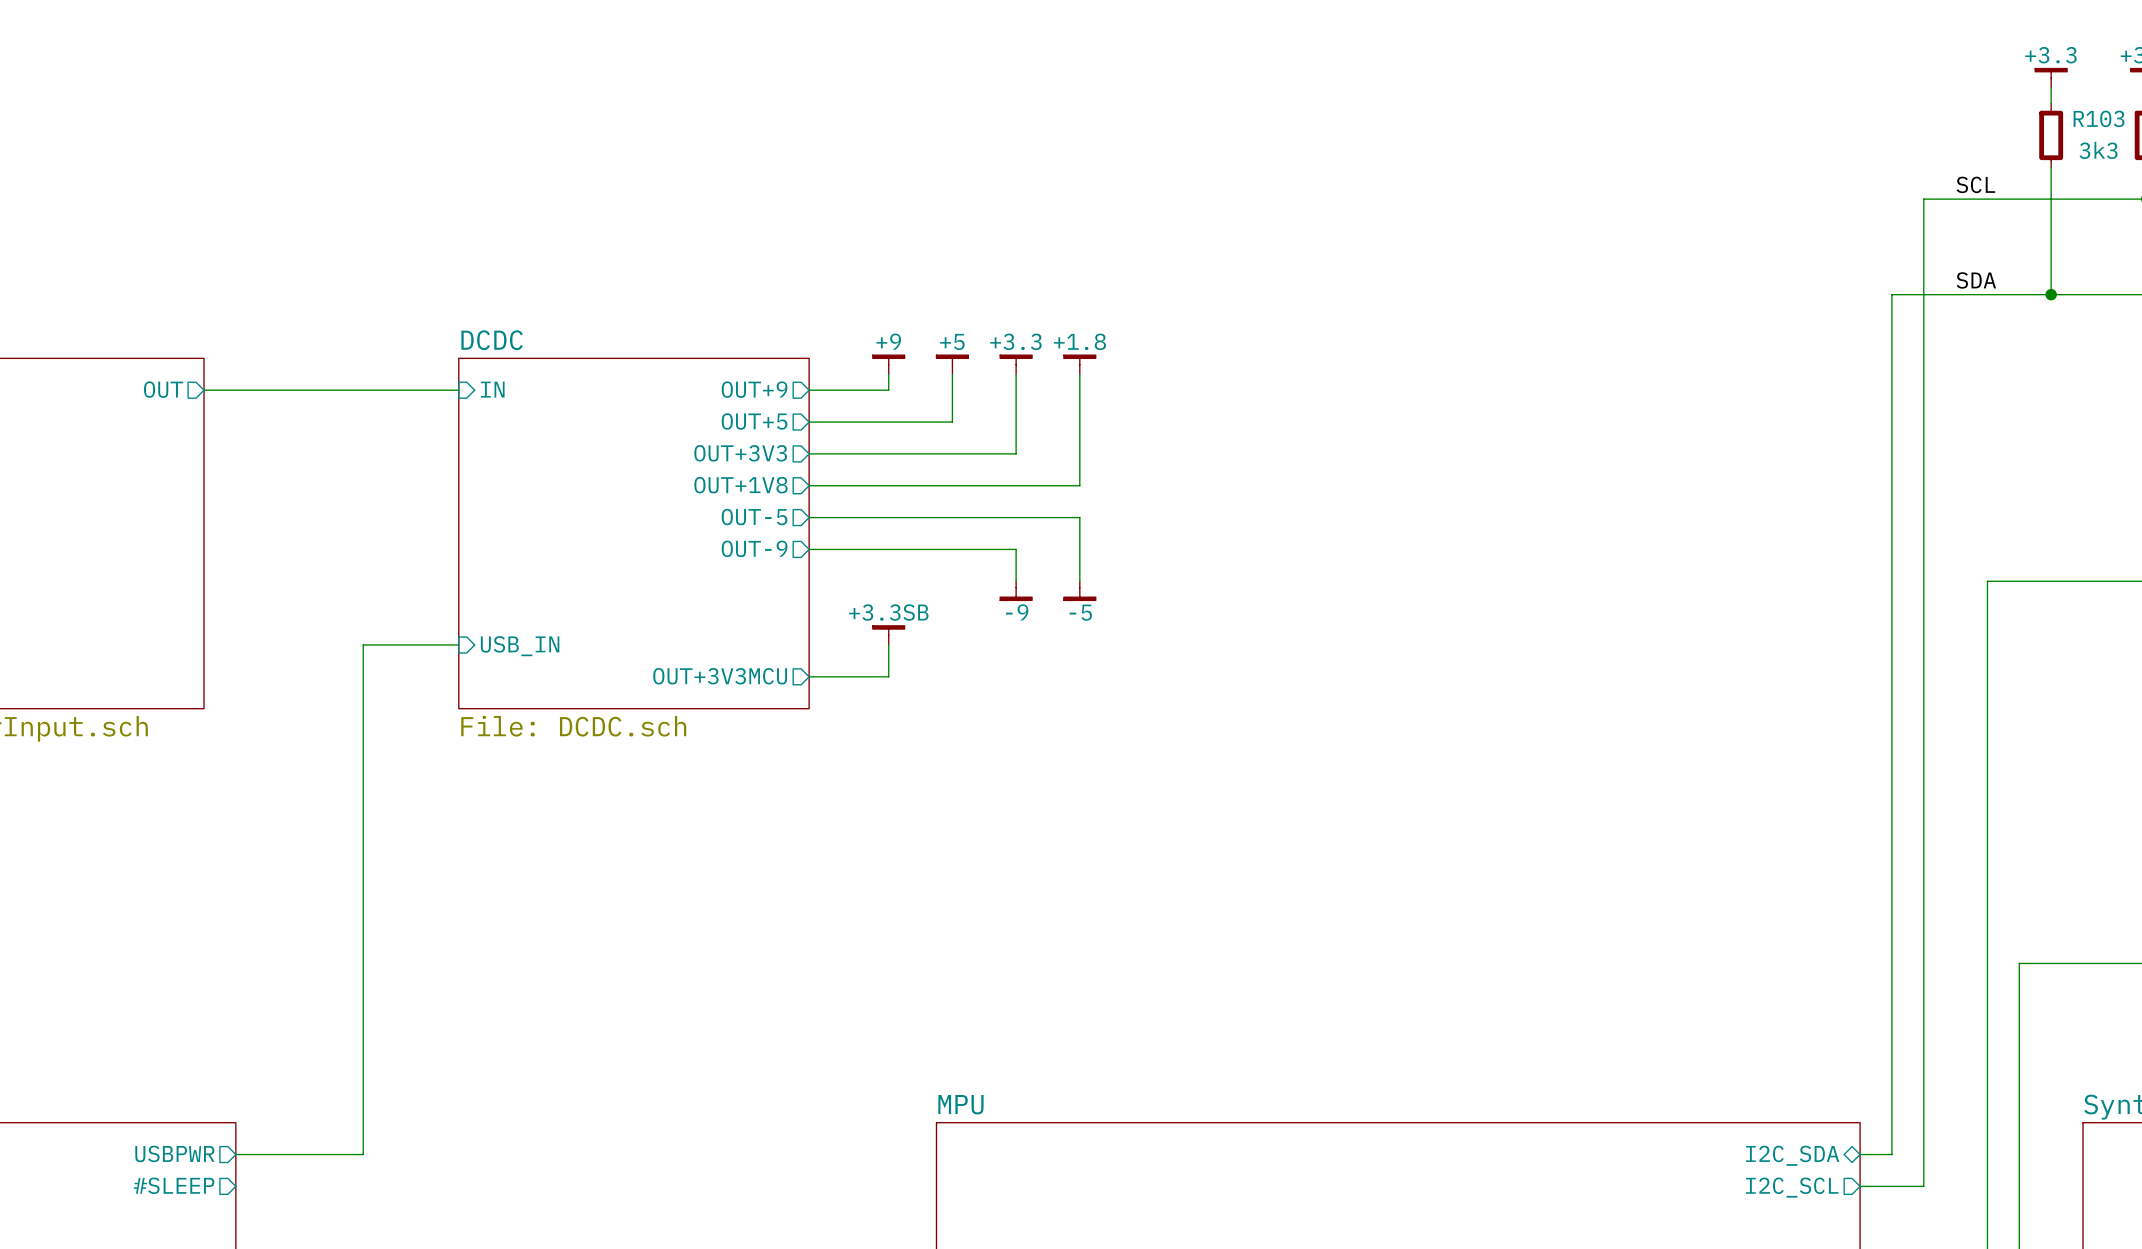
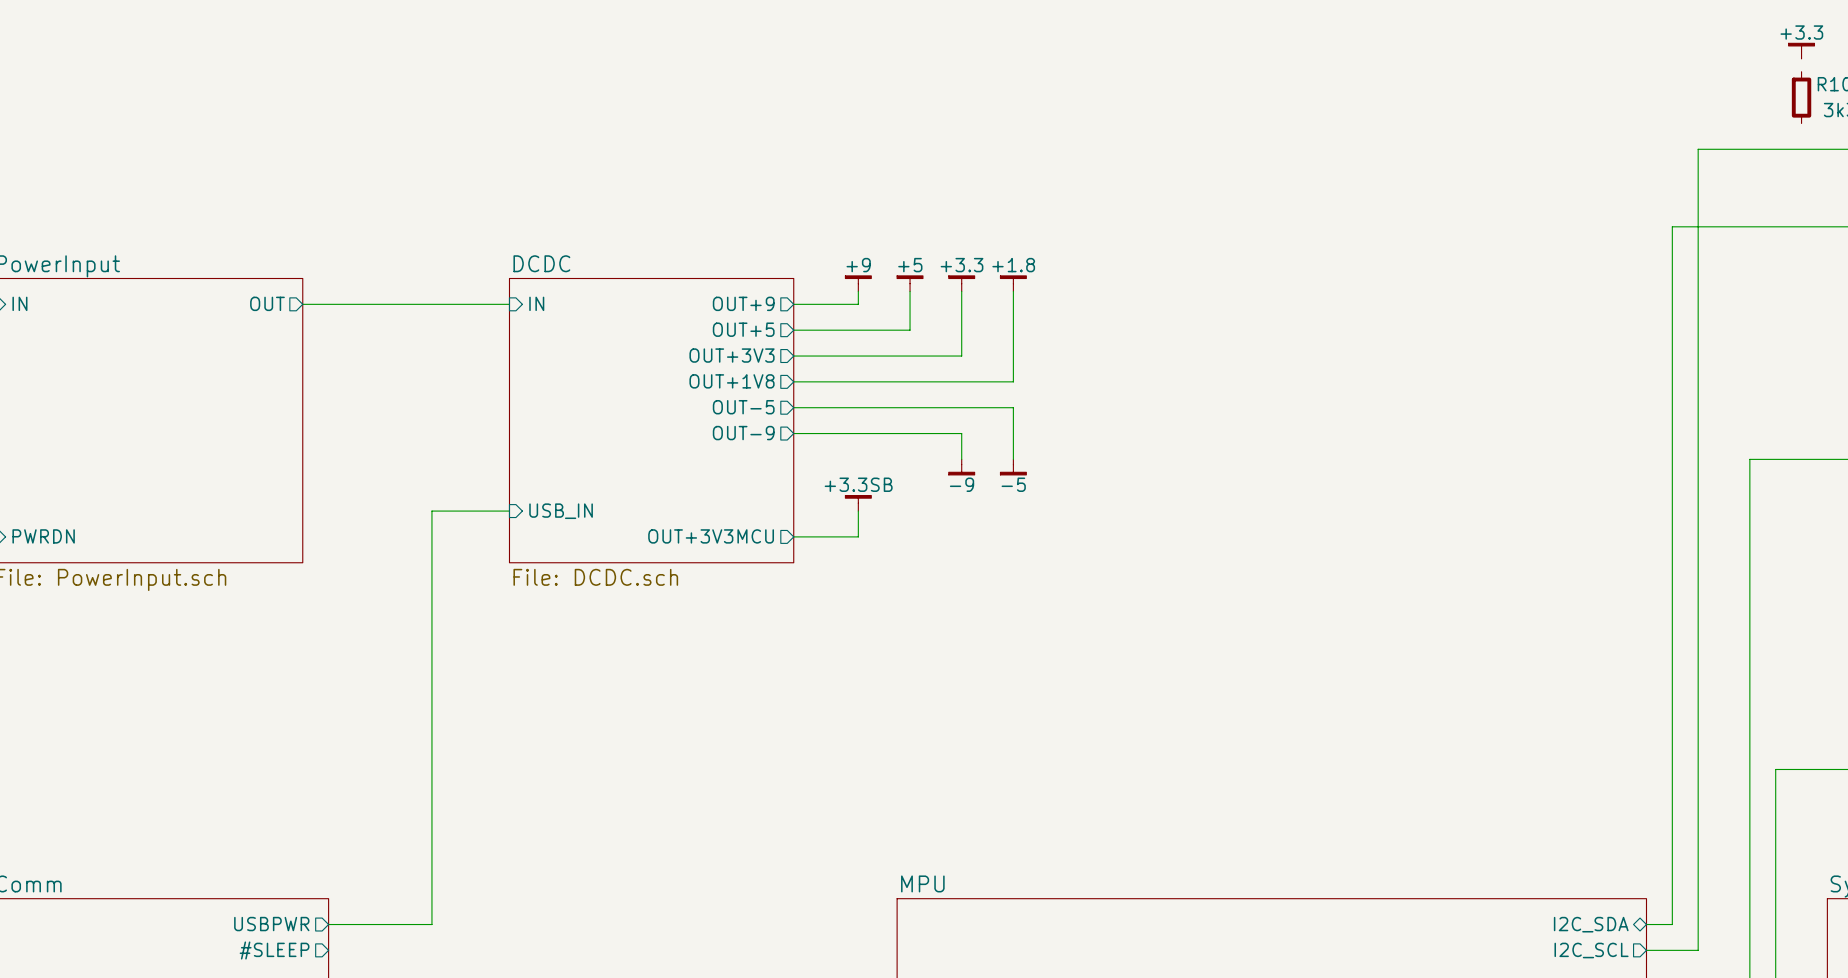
wire: (2051, 87) (2051, 103) -> none
wire: (2051, 167) (2051, 294) -> none
label: SCL (1975, 184) -> none
label: SDA (1976, 280) -> none
junction: (2051, 294) -> none

